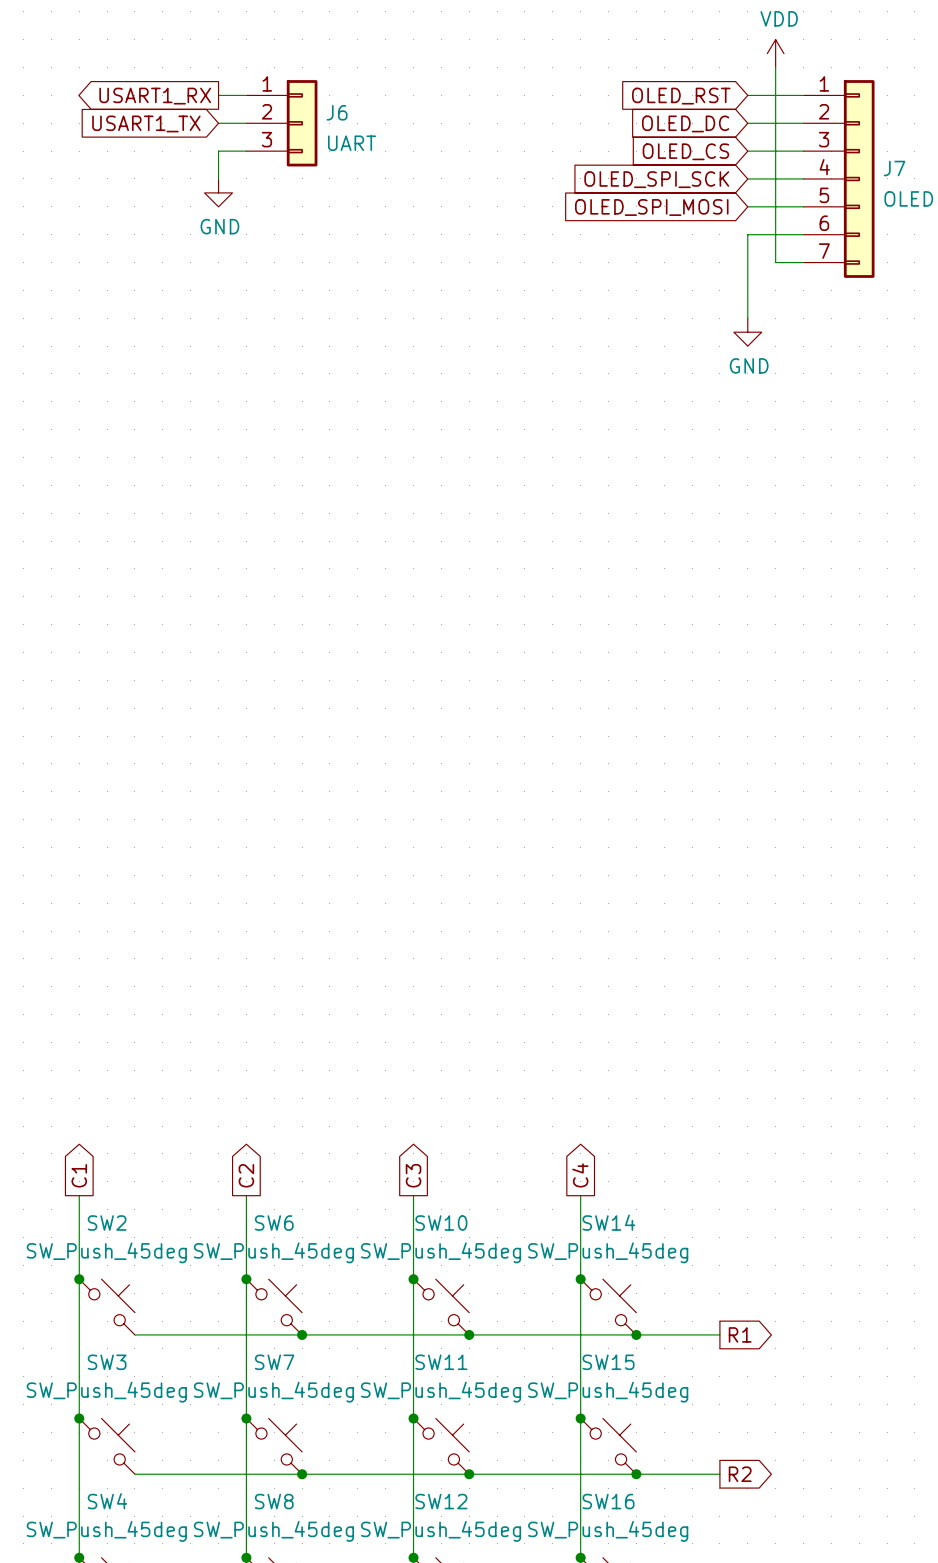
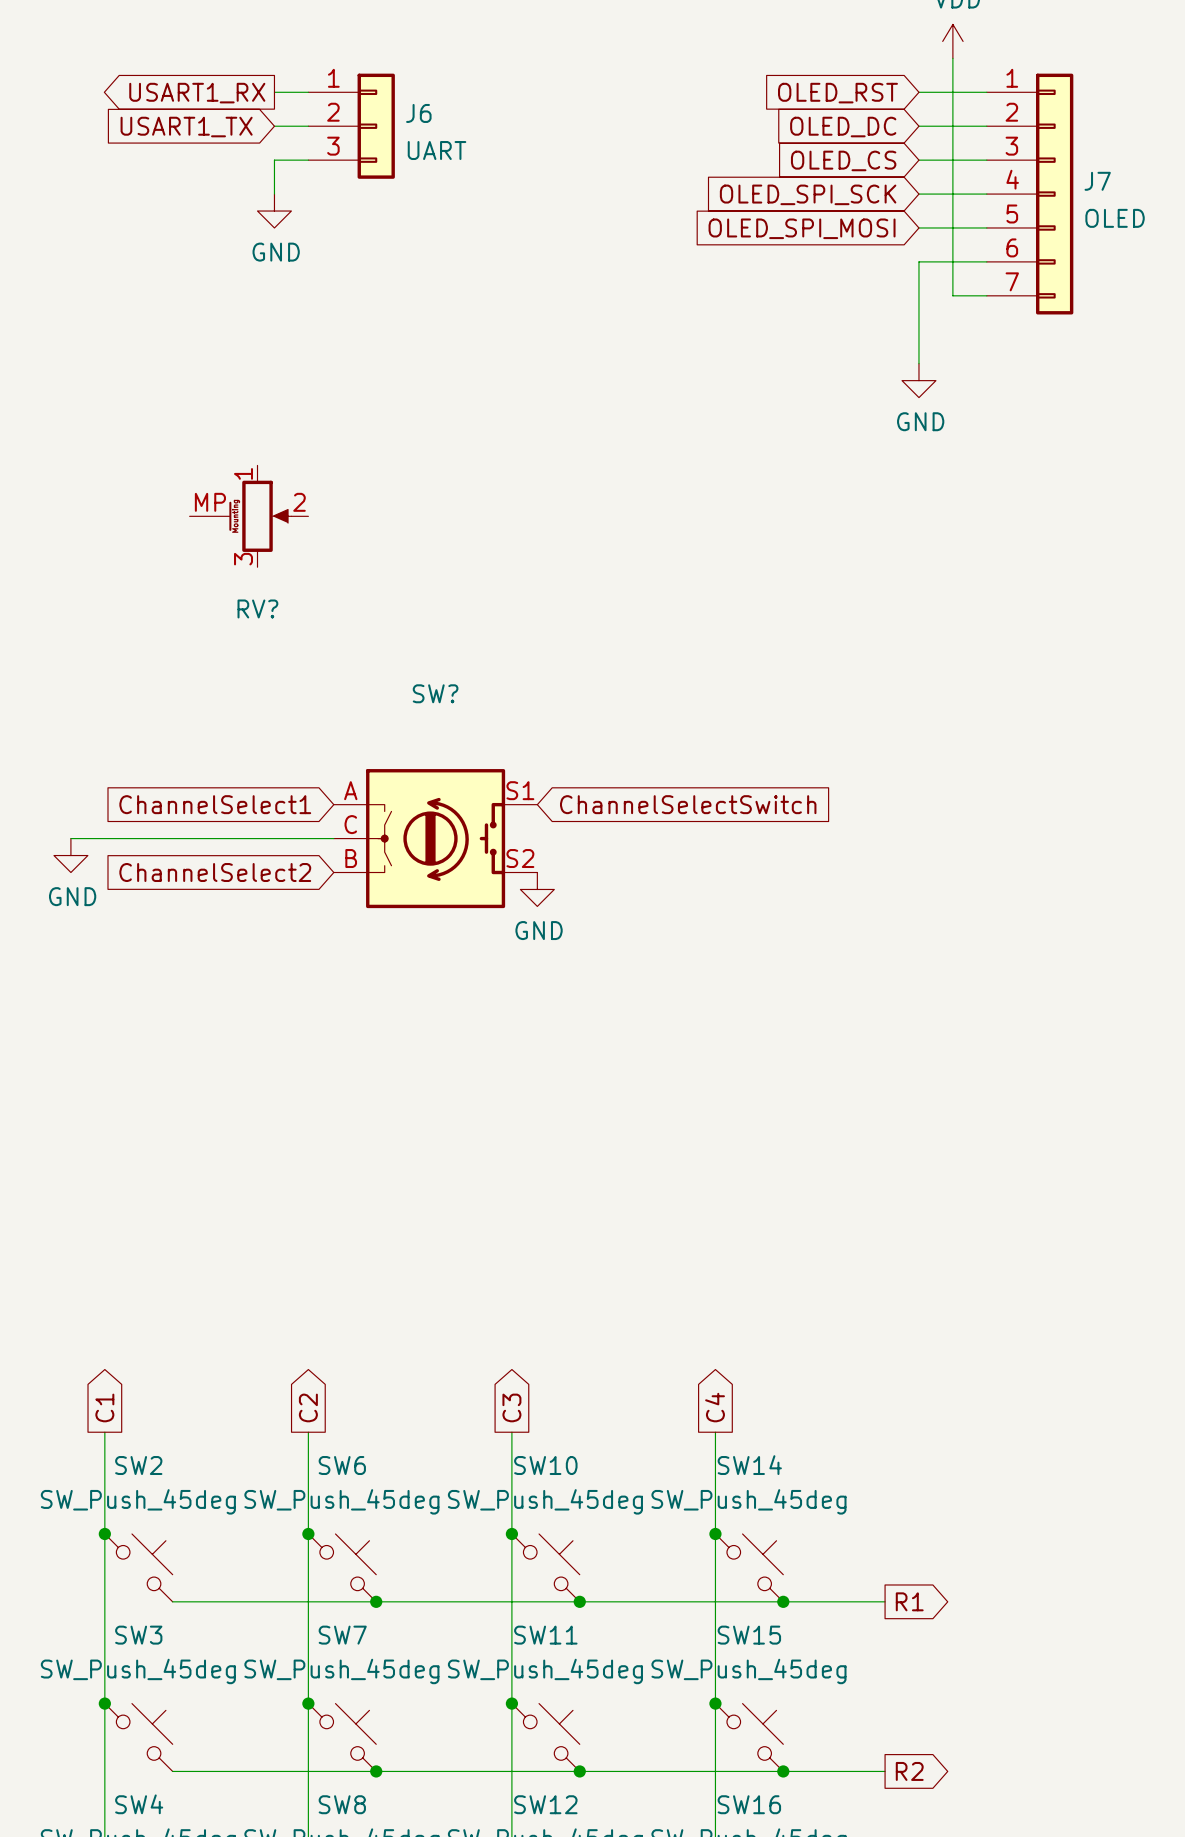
RV?: none -> (249, 516)
global label: none -> ChannelSelect1 (215, 804)
global label: none -> ChannelSelectSwitch (688, 804)
wire: none -> (70, 838) (333, 838)
SW?: none -> (435, 838)
power symbol: none -> GND (70, 855)
global label: none -> ChannelSelect2 (215, 872)
power symbol: none -> GND (537, 889)

